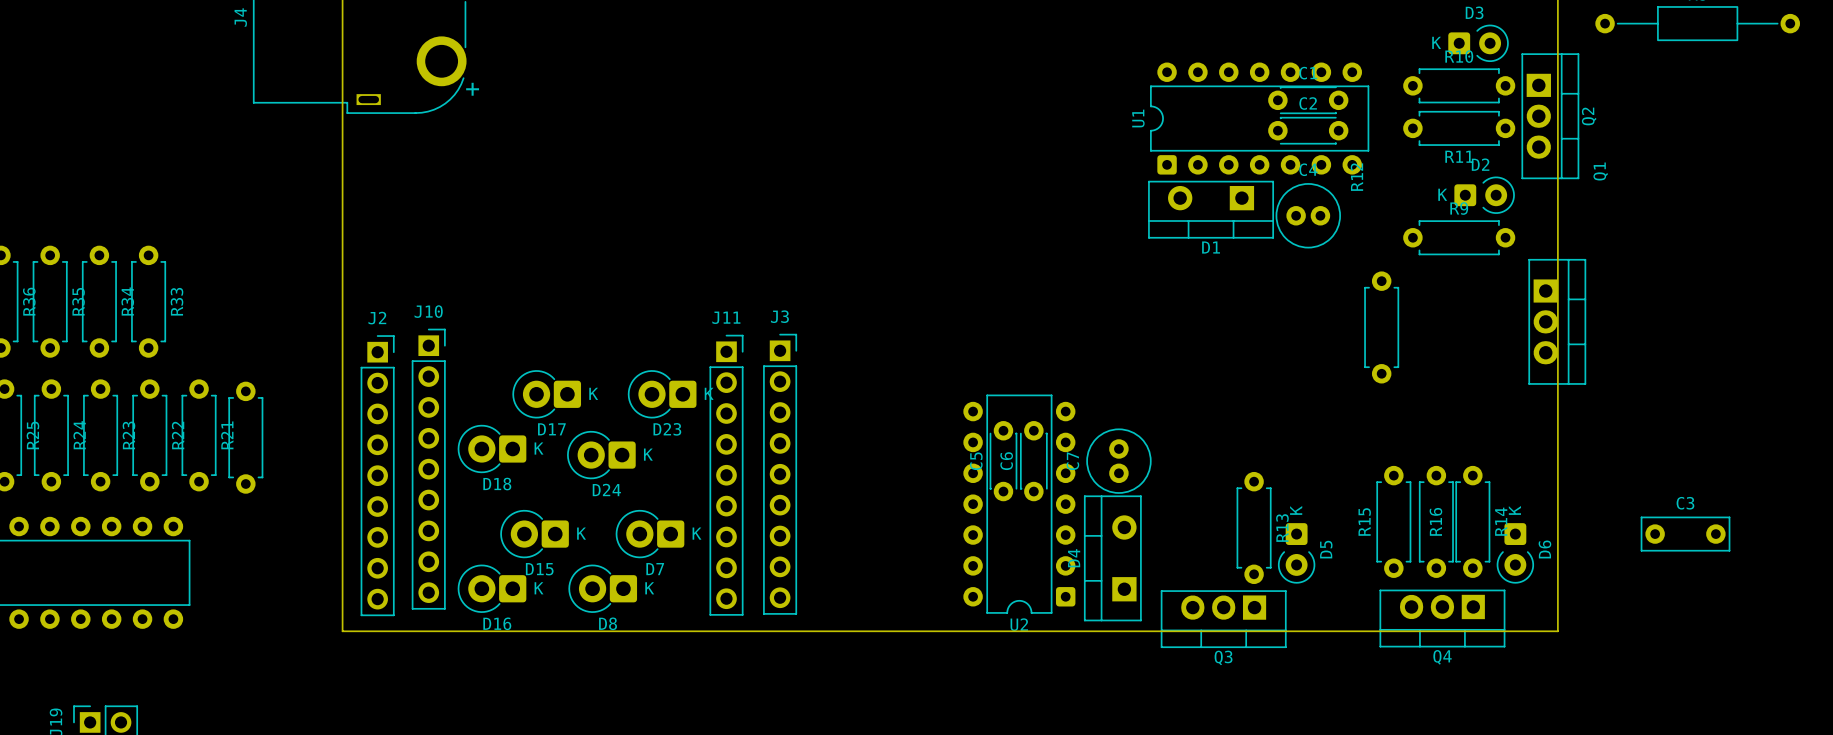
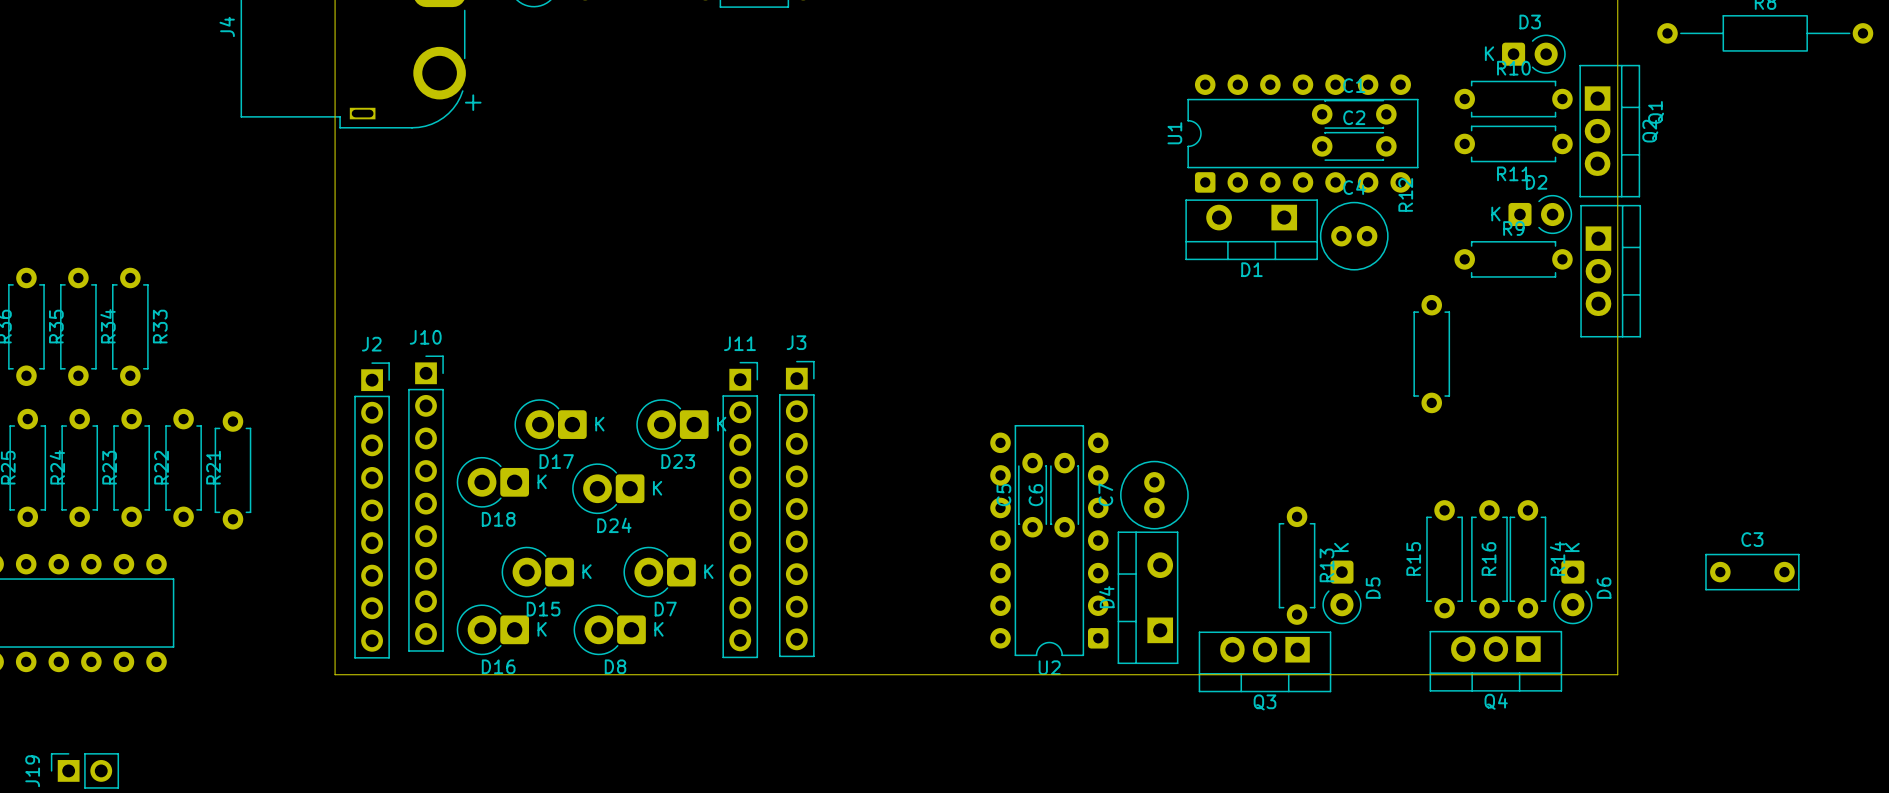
Q1 position: (1557, 321) -> (1610, 271)

